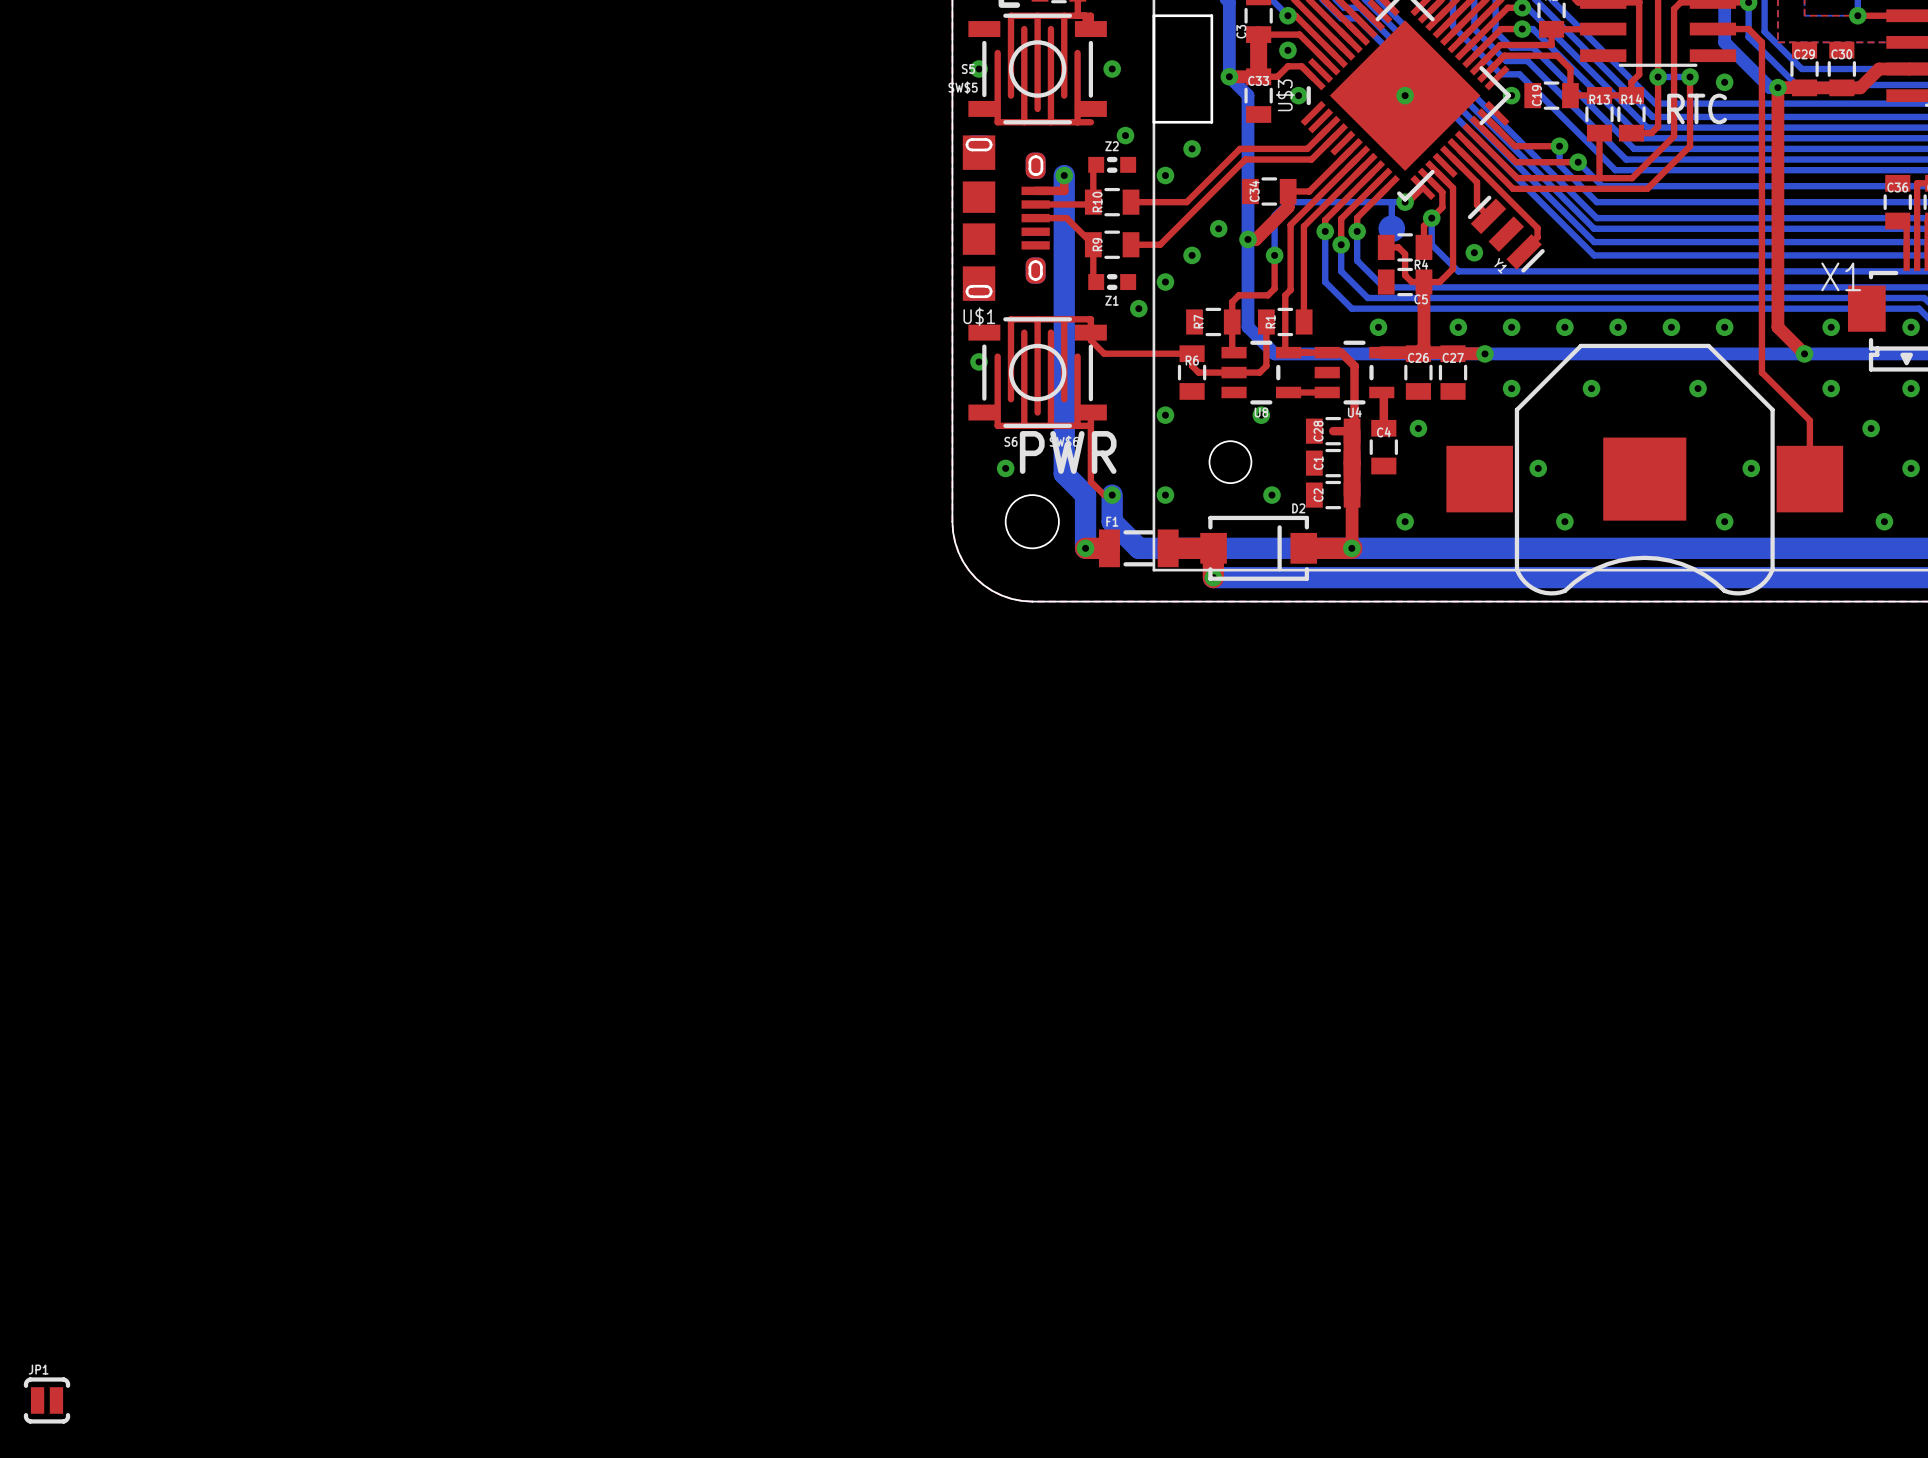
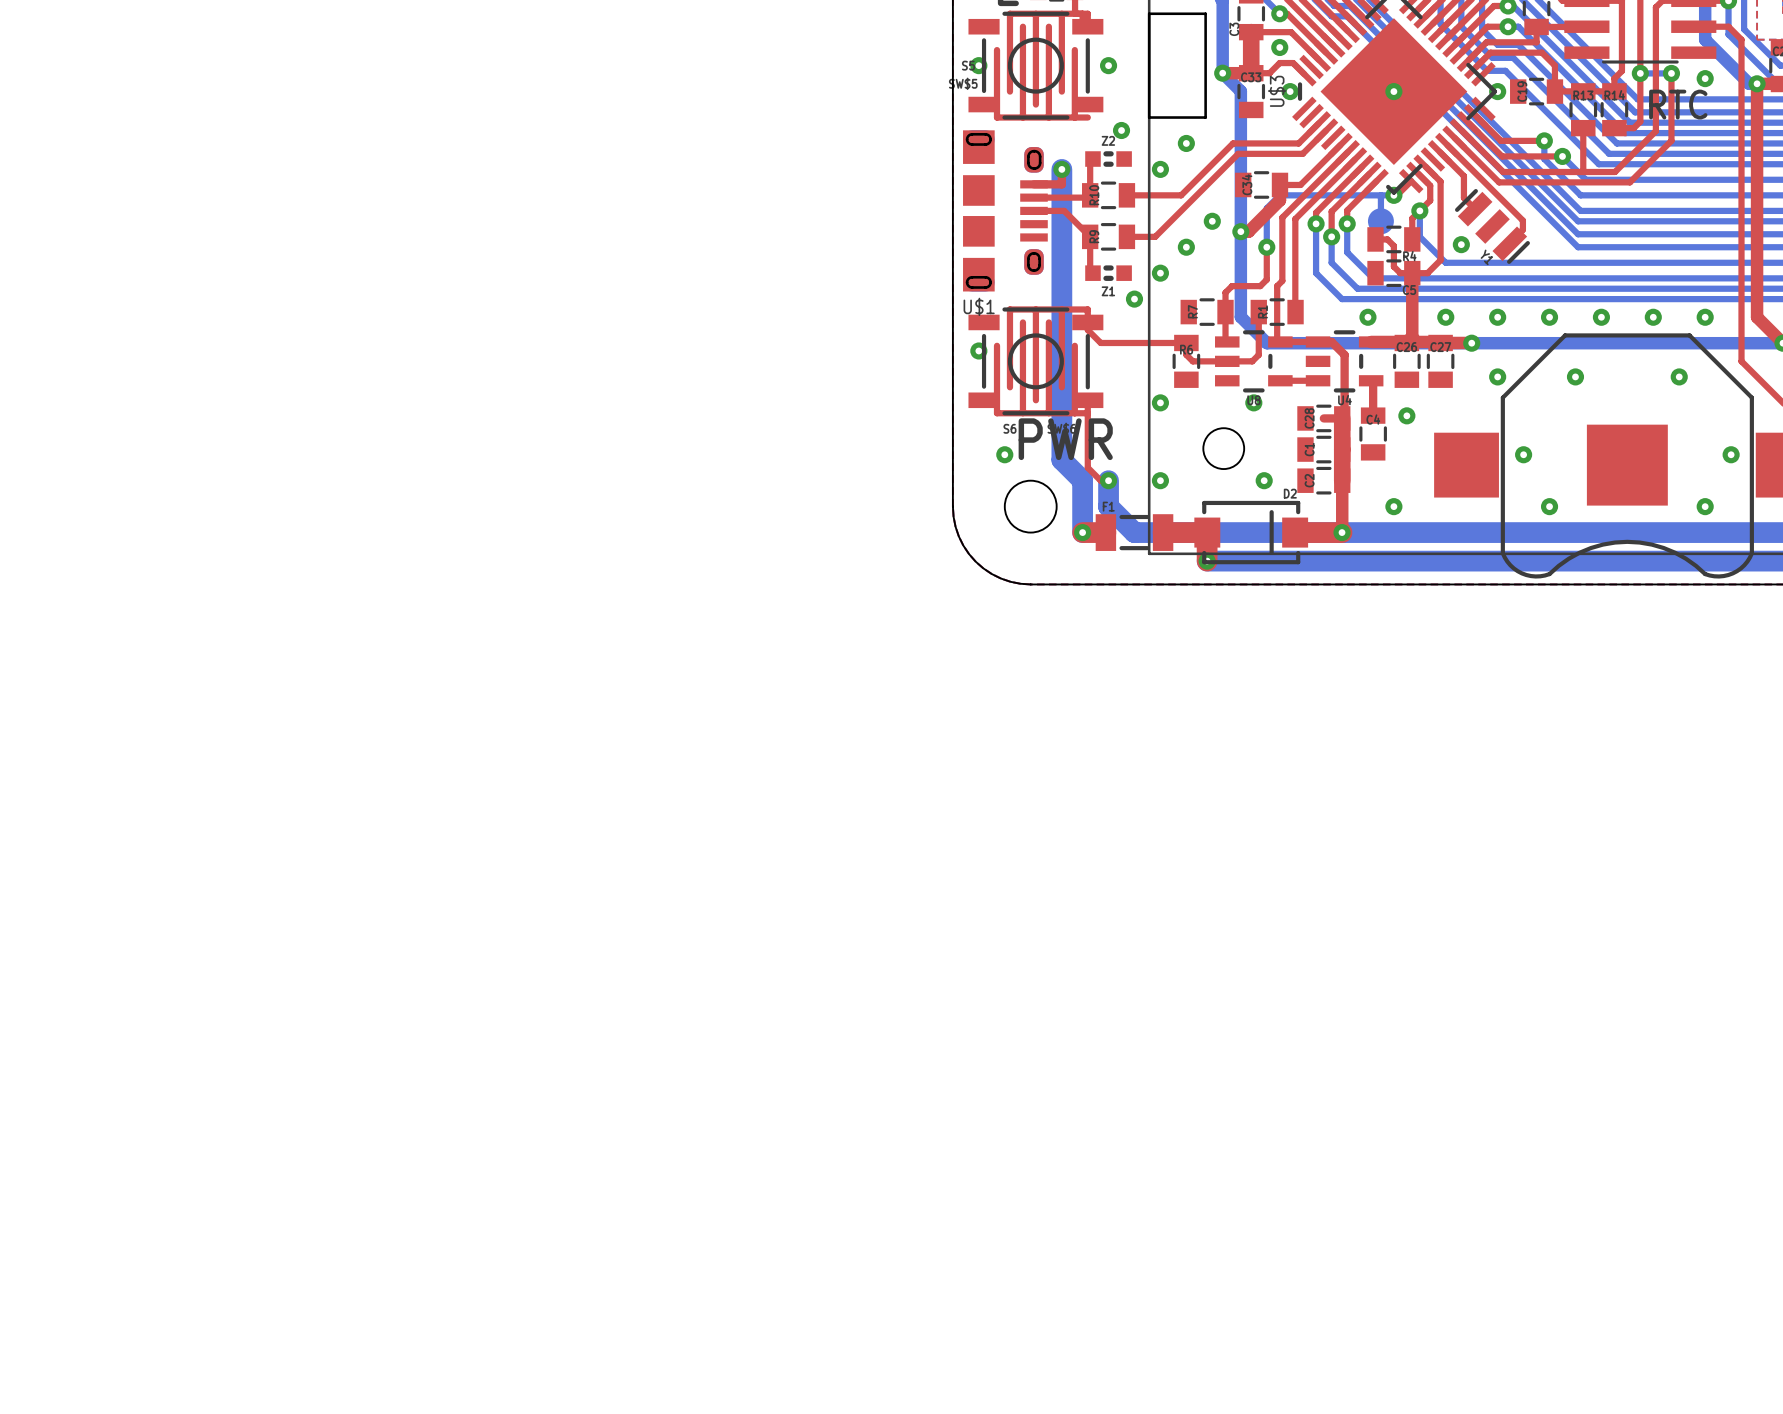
JP1: (47, 1400) -> none

